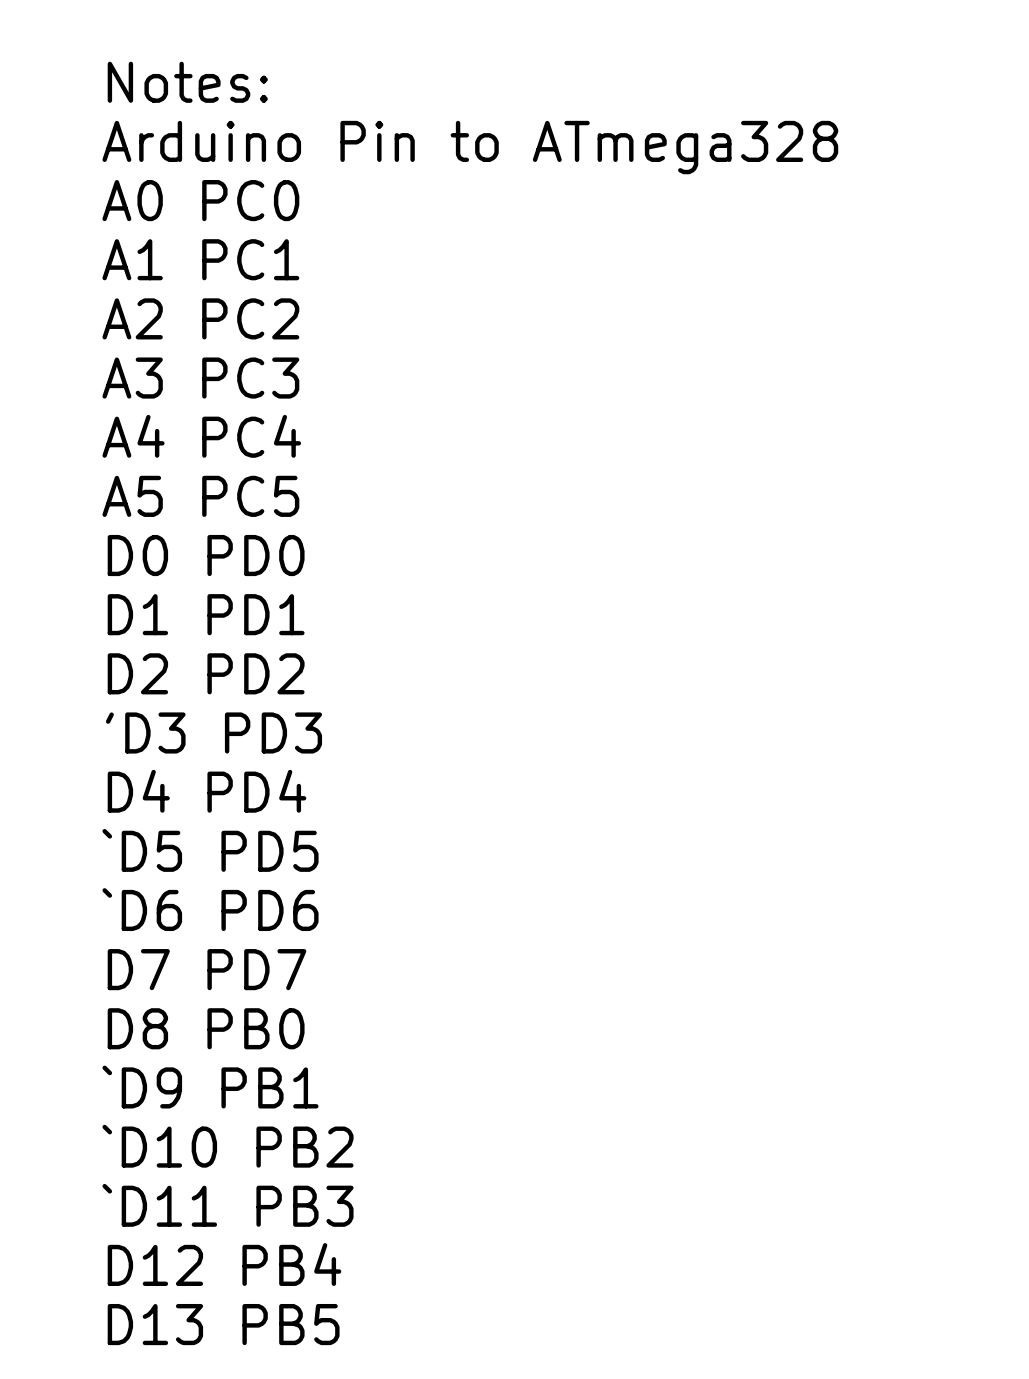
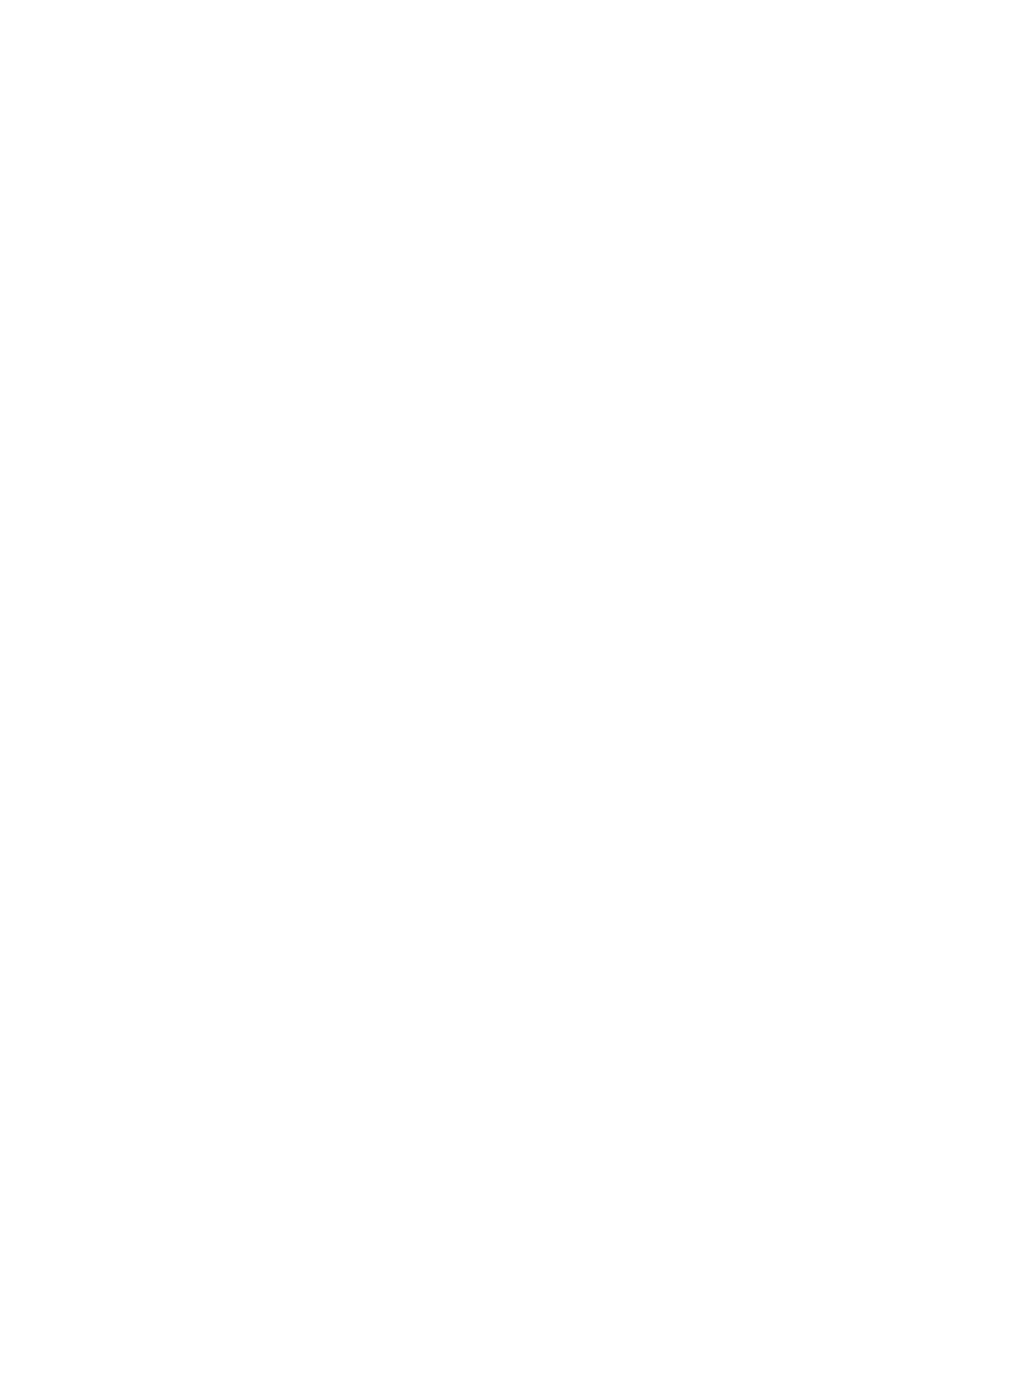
text: Notes: (187, 82) -> none
text: Arduino Pin to ATmega328 (470, 147) -> none
text: A0 PC0 (200, 200) -> none
text: A1 PC1 (200, 259) -> none
text: A2 PC2 (200, 318) -> none
text: A3 PC3 (200, 378) -> none
text: A4 PC4 (201, 436) -> none
text: A5 PC5 (200, 496) -> none
text: D0 PD0 (206, 555) -> none
text: D1 PD1 (206, 614) -> none
text: D2 PD2 (206, 673) -> none
text: 'D3 PD3 (214, 732) -> none
text: D4 PD4 (207, 791) -> none
text: `D5 PD5 (210, 850) -> none
text: `D6 PD6 (210, 909) -> none
text: D7 PD7 (207, 969) -> none
text: D8 PB0 (206, 1028) -> none
text: `D9 PB1 (210, 1087) -> none
text: `D10 PB2 (227, 1146) -> none
text: `D11 PB3 (227, 1205) -> none
text: D12 PB4 (224, 1264) -> none
text: D13 PB5 (223, 1324) -> none

